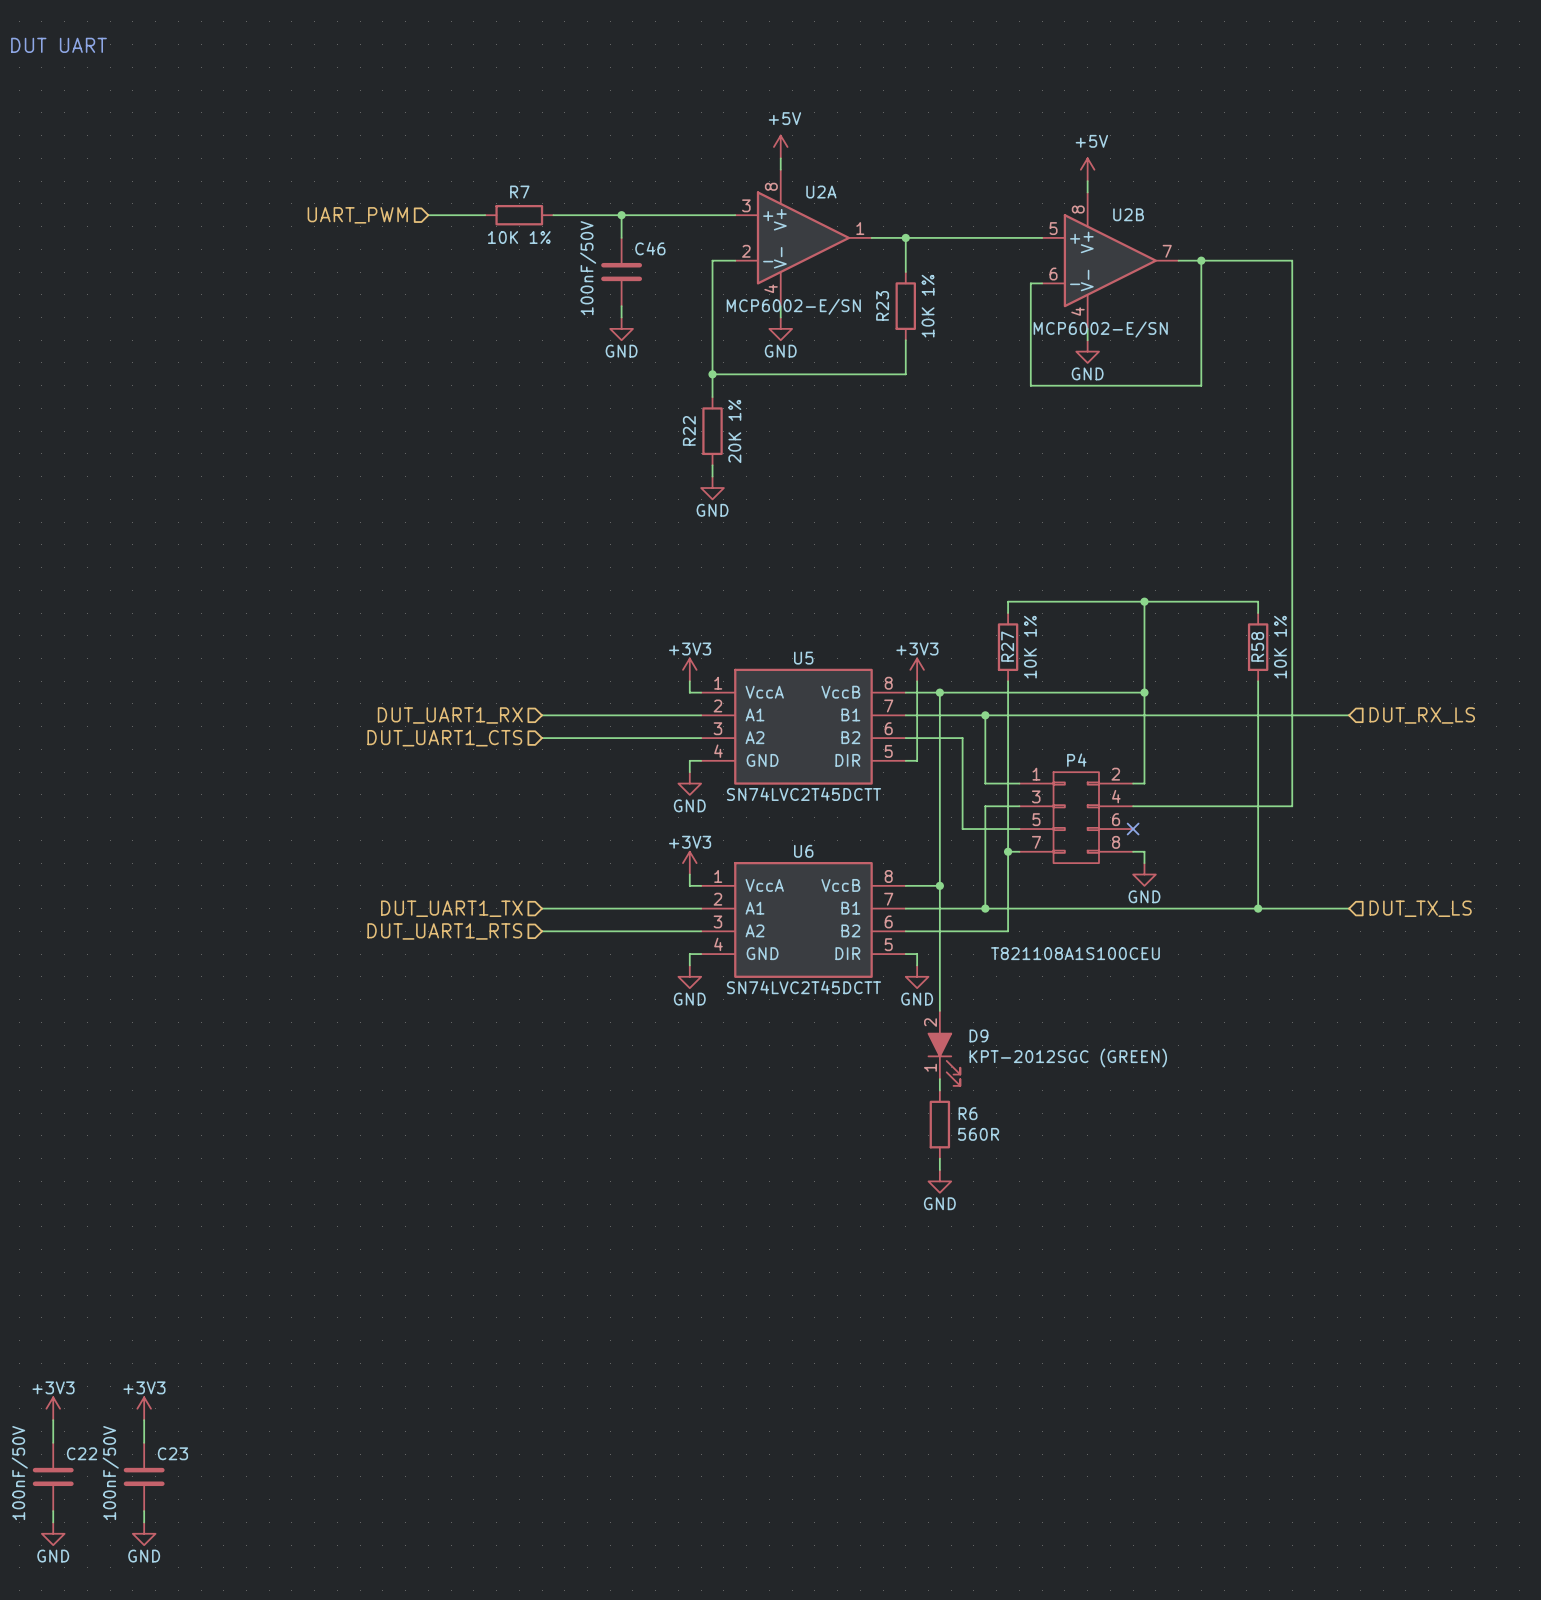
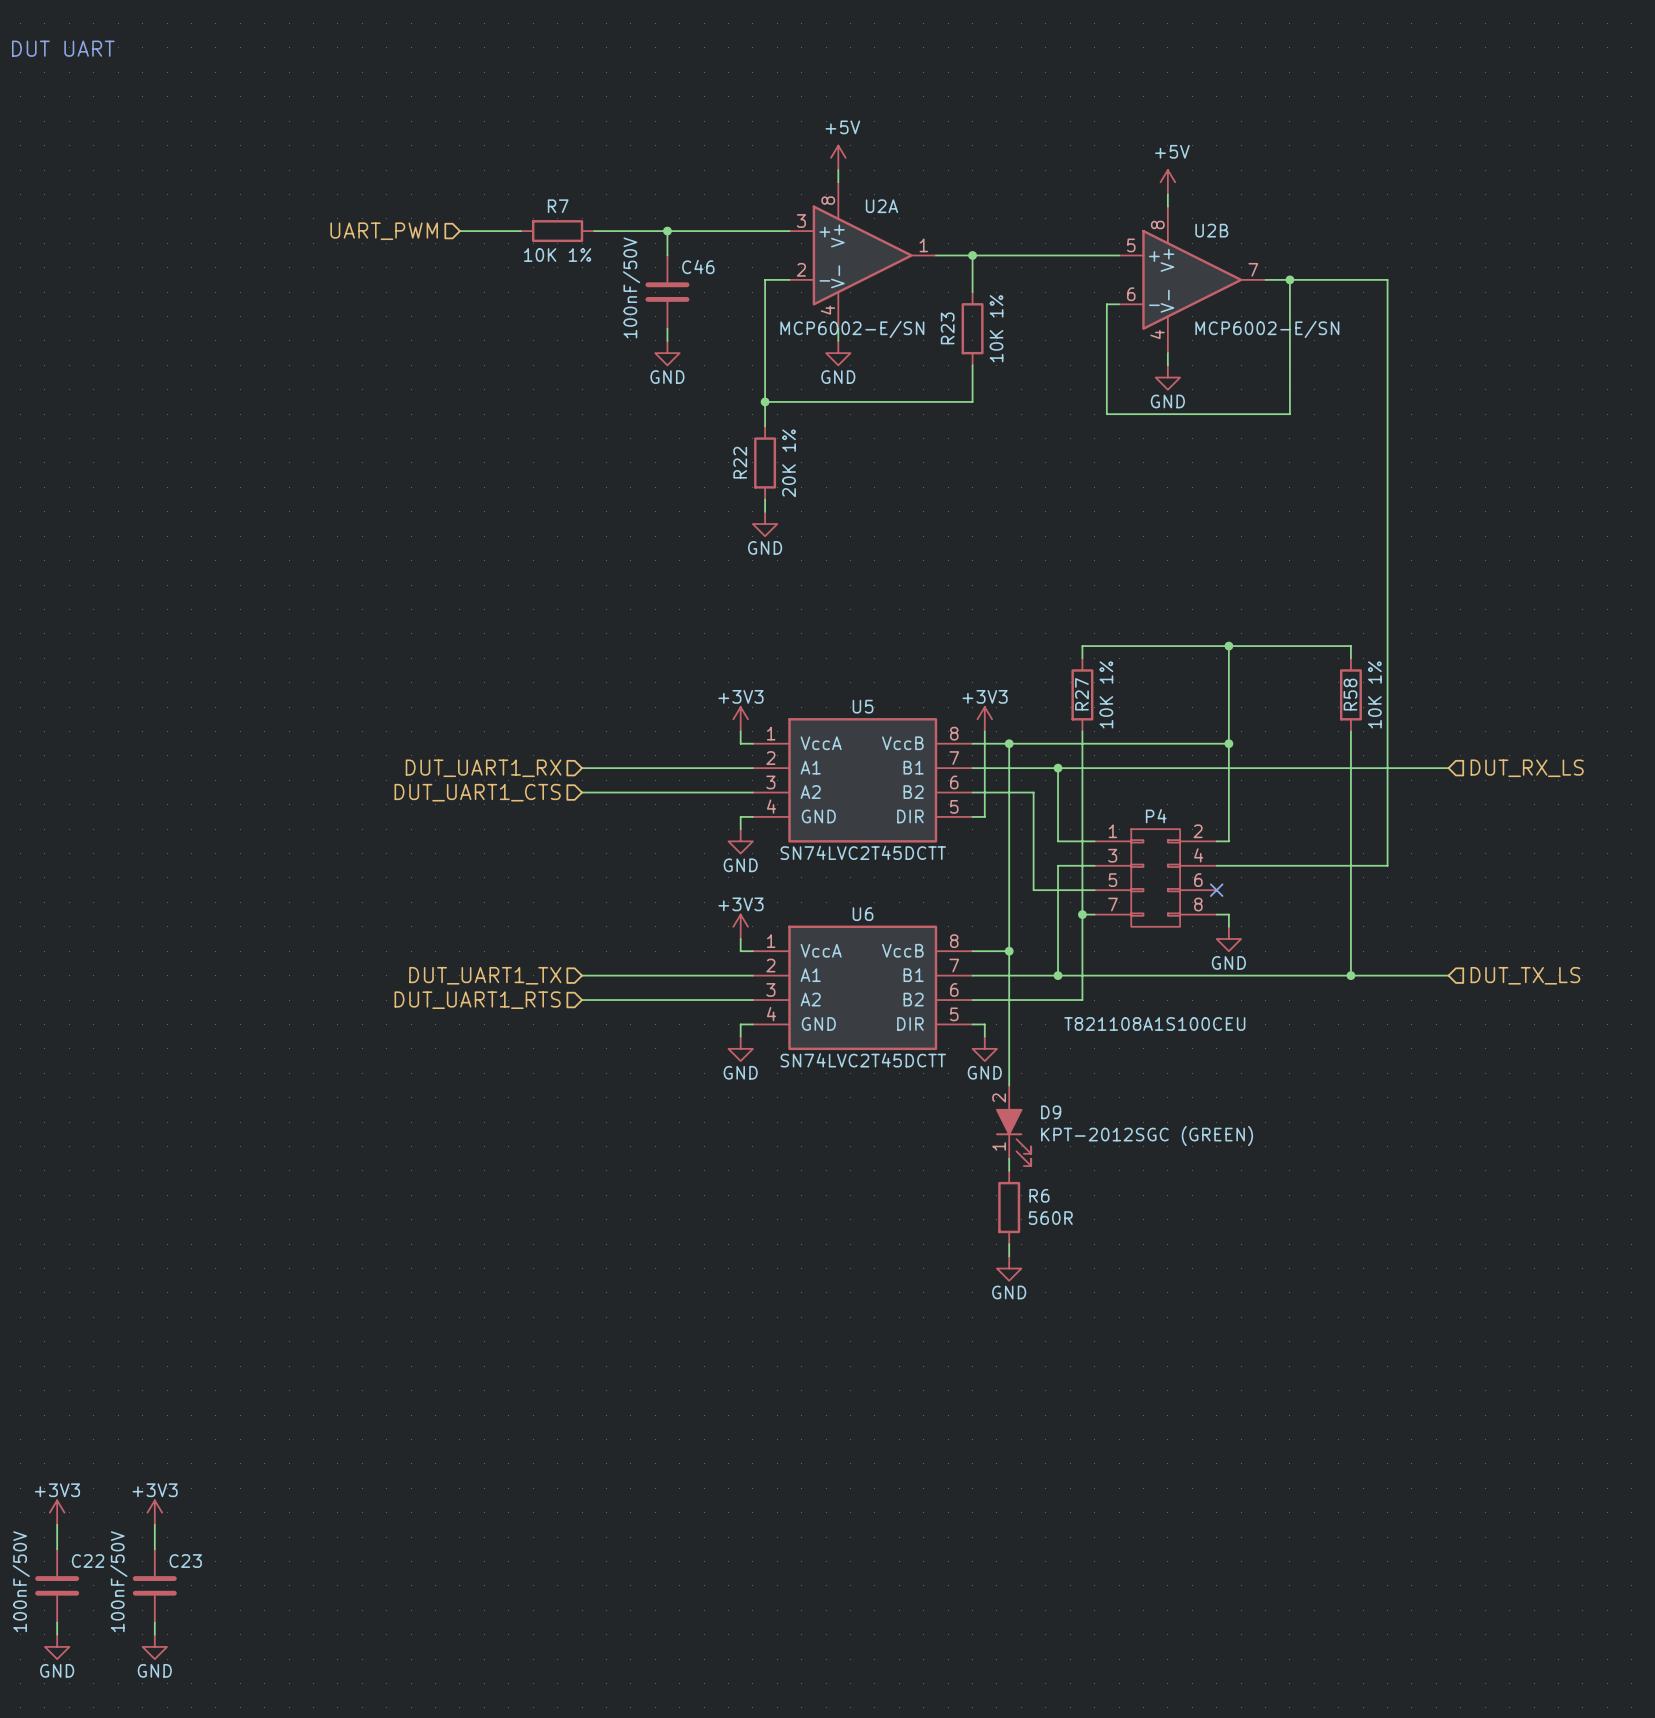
U2B value position: MCP6002-E/SN (1100, 329) -> MCP6002-E/SN (1267, 329)

